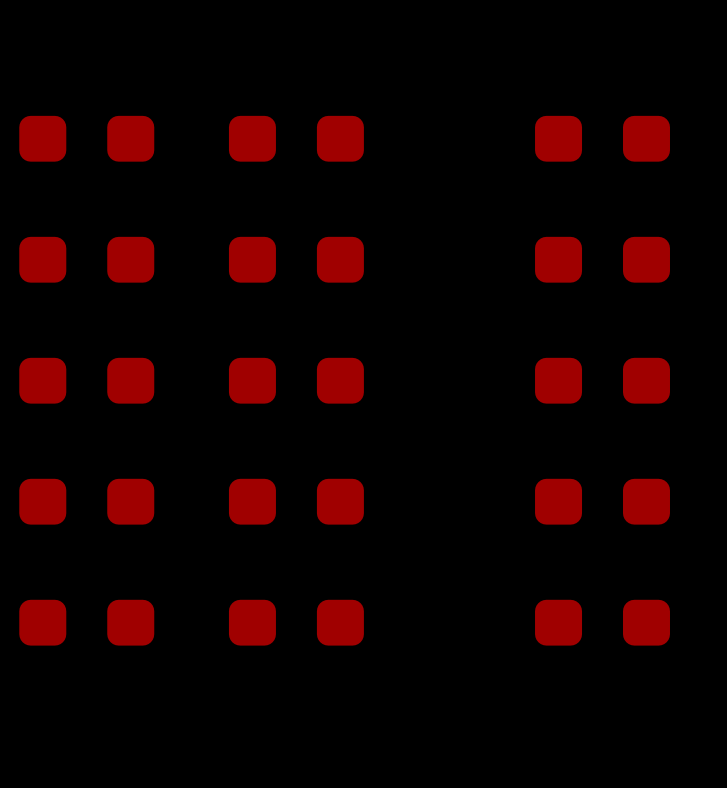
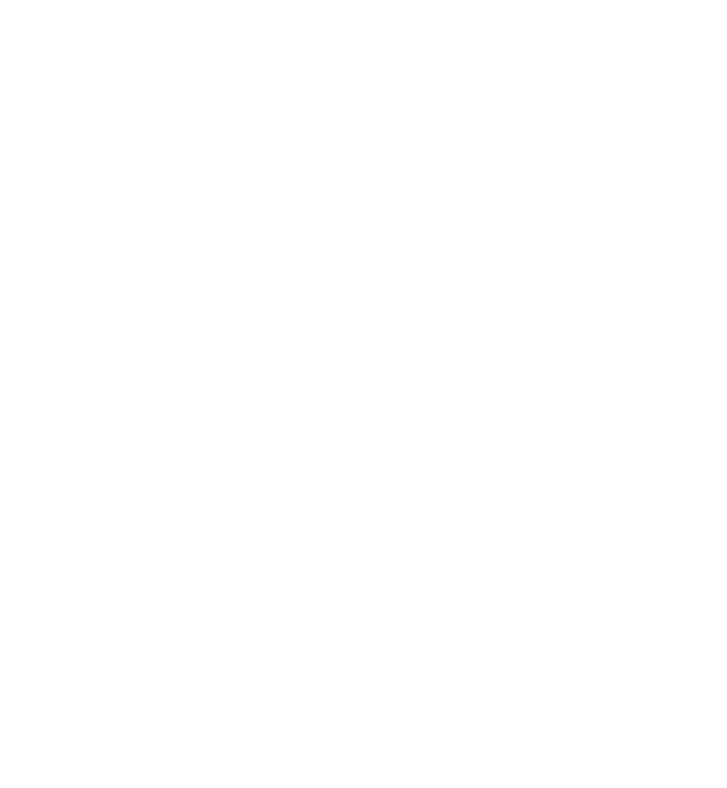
part: (86, 138) -> none
part: (296, 138) -> none
part: (602, 138) -> none
part: (86, 259) -> none
part: (296, 259) -> none
part: (602, 259) -> none
part: (86, 380) -> none
part: (296, 380) -> none
part: (602, 380) -> none
part: (86, 501) -> none
part: (296, 501) -> none
part: (602, 501) -> none
part: (86, 622) -> none
part: (296, 622) -> none
part: (602, 622) -> none

